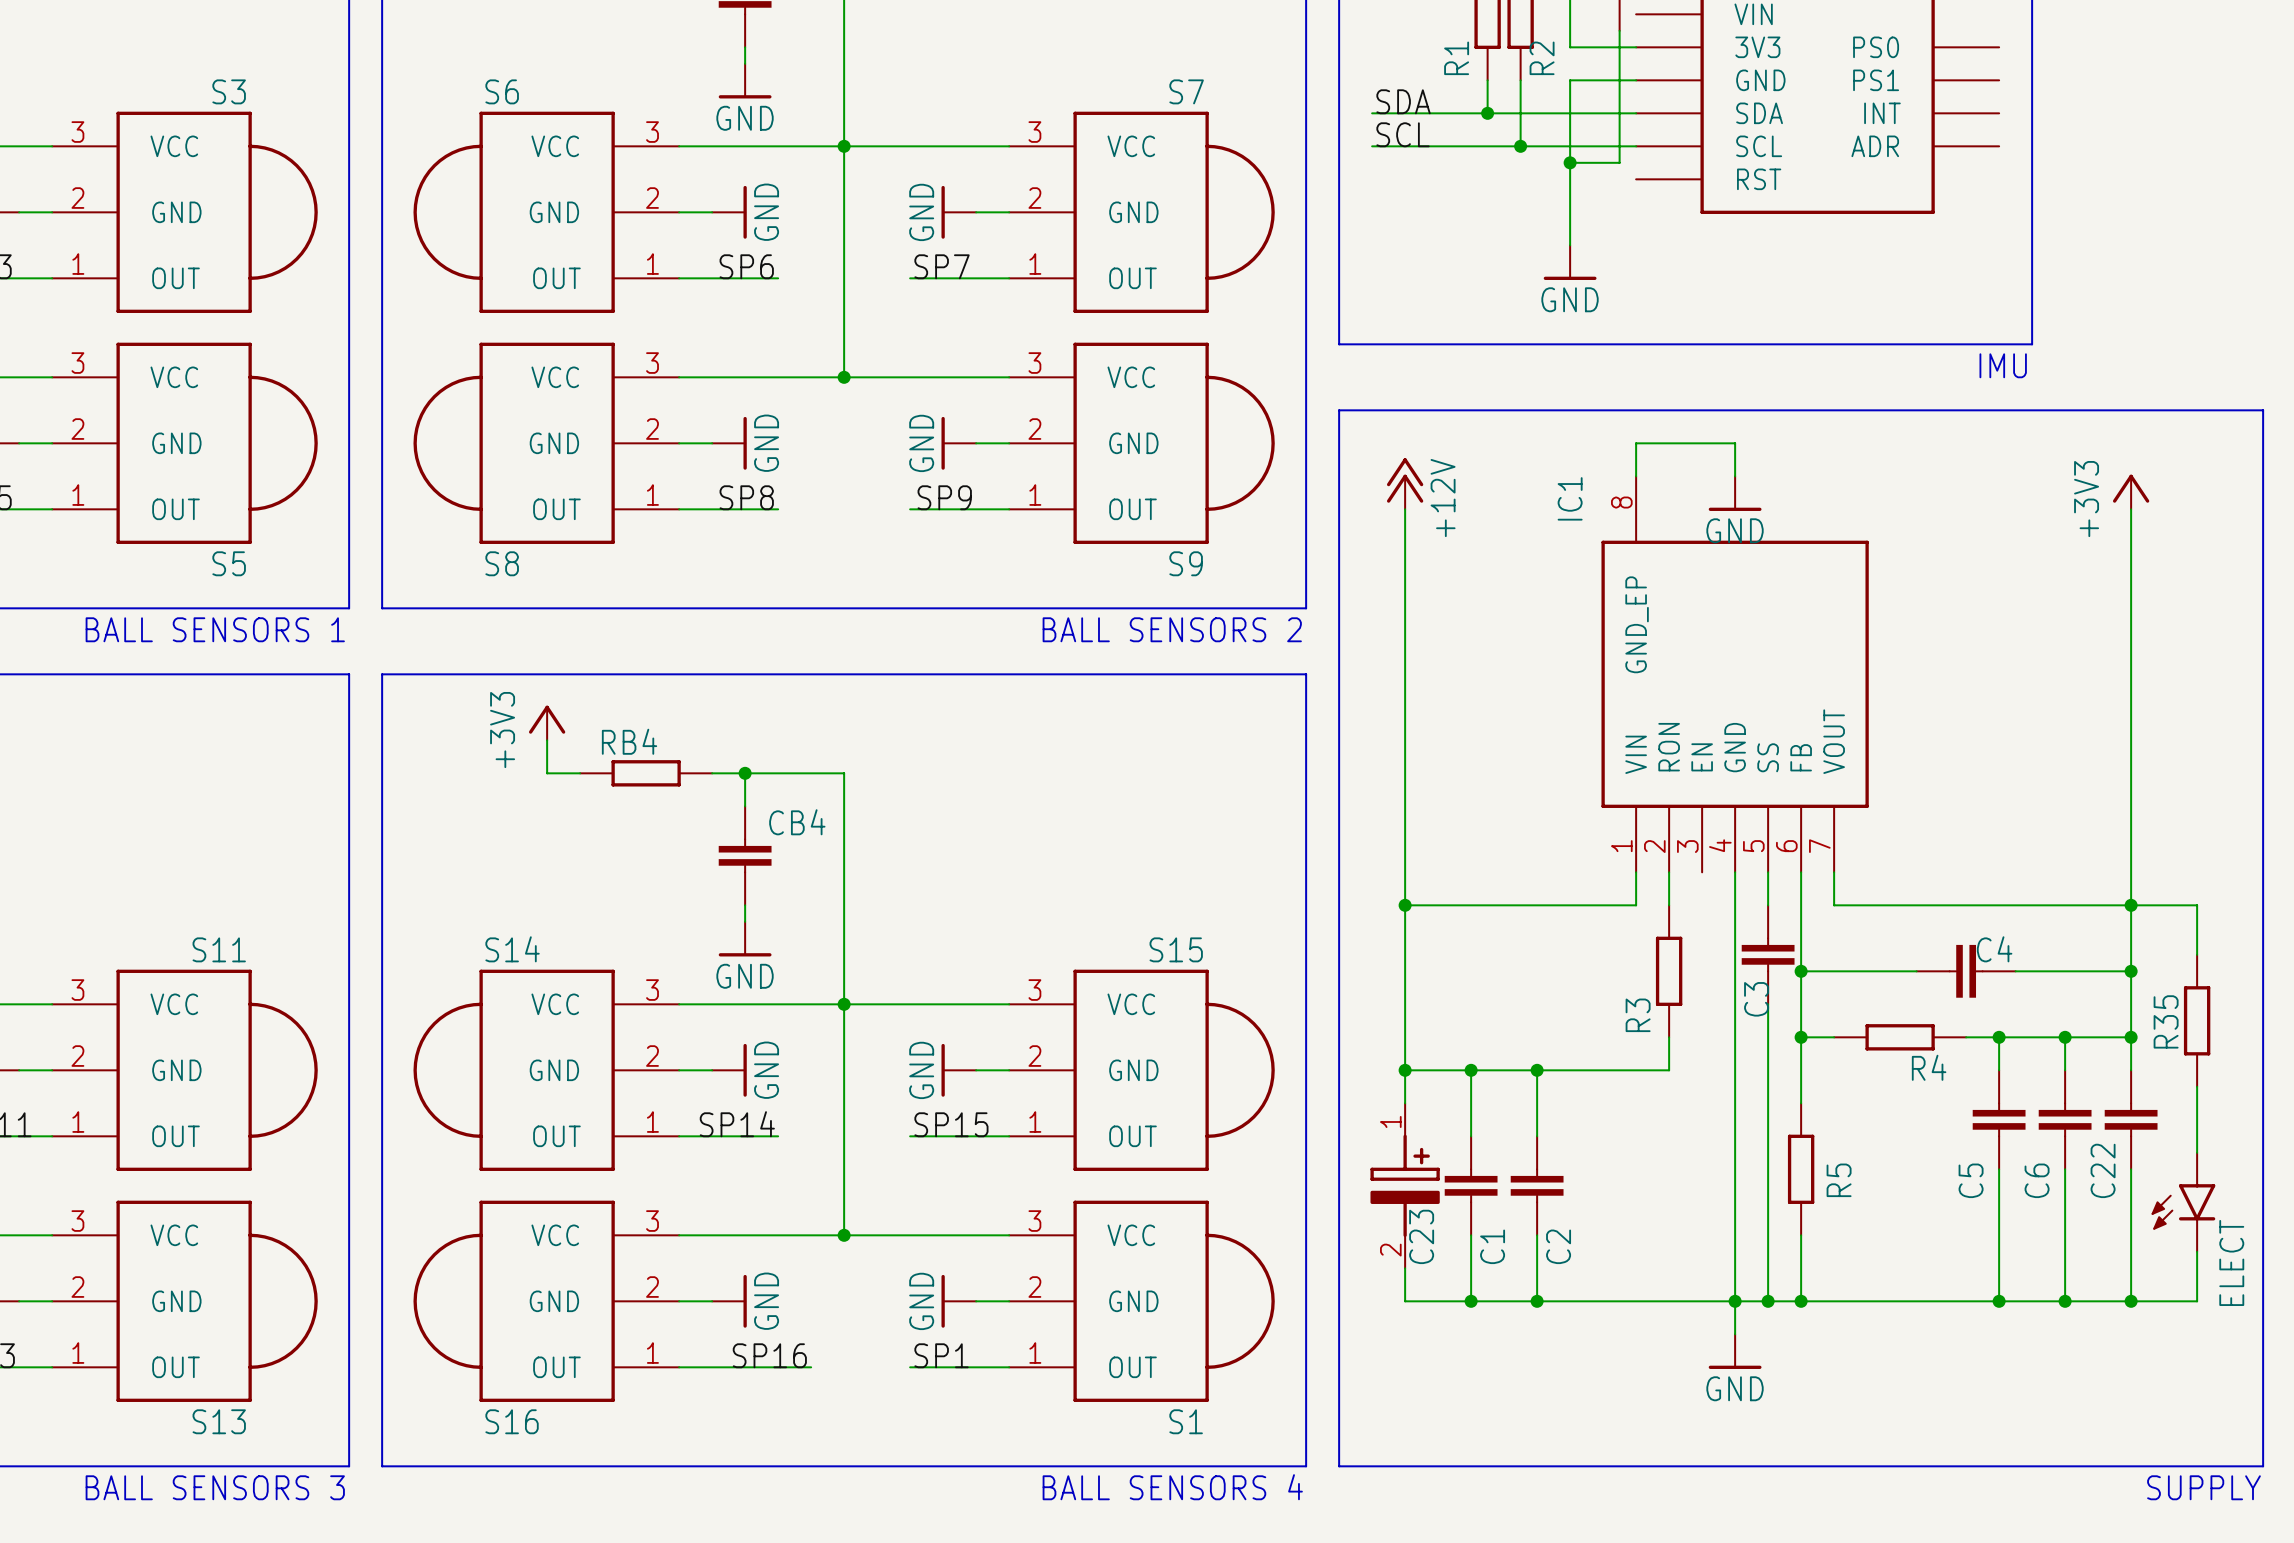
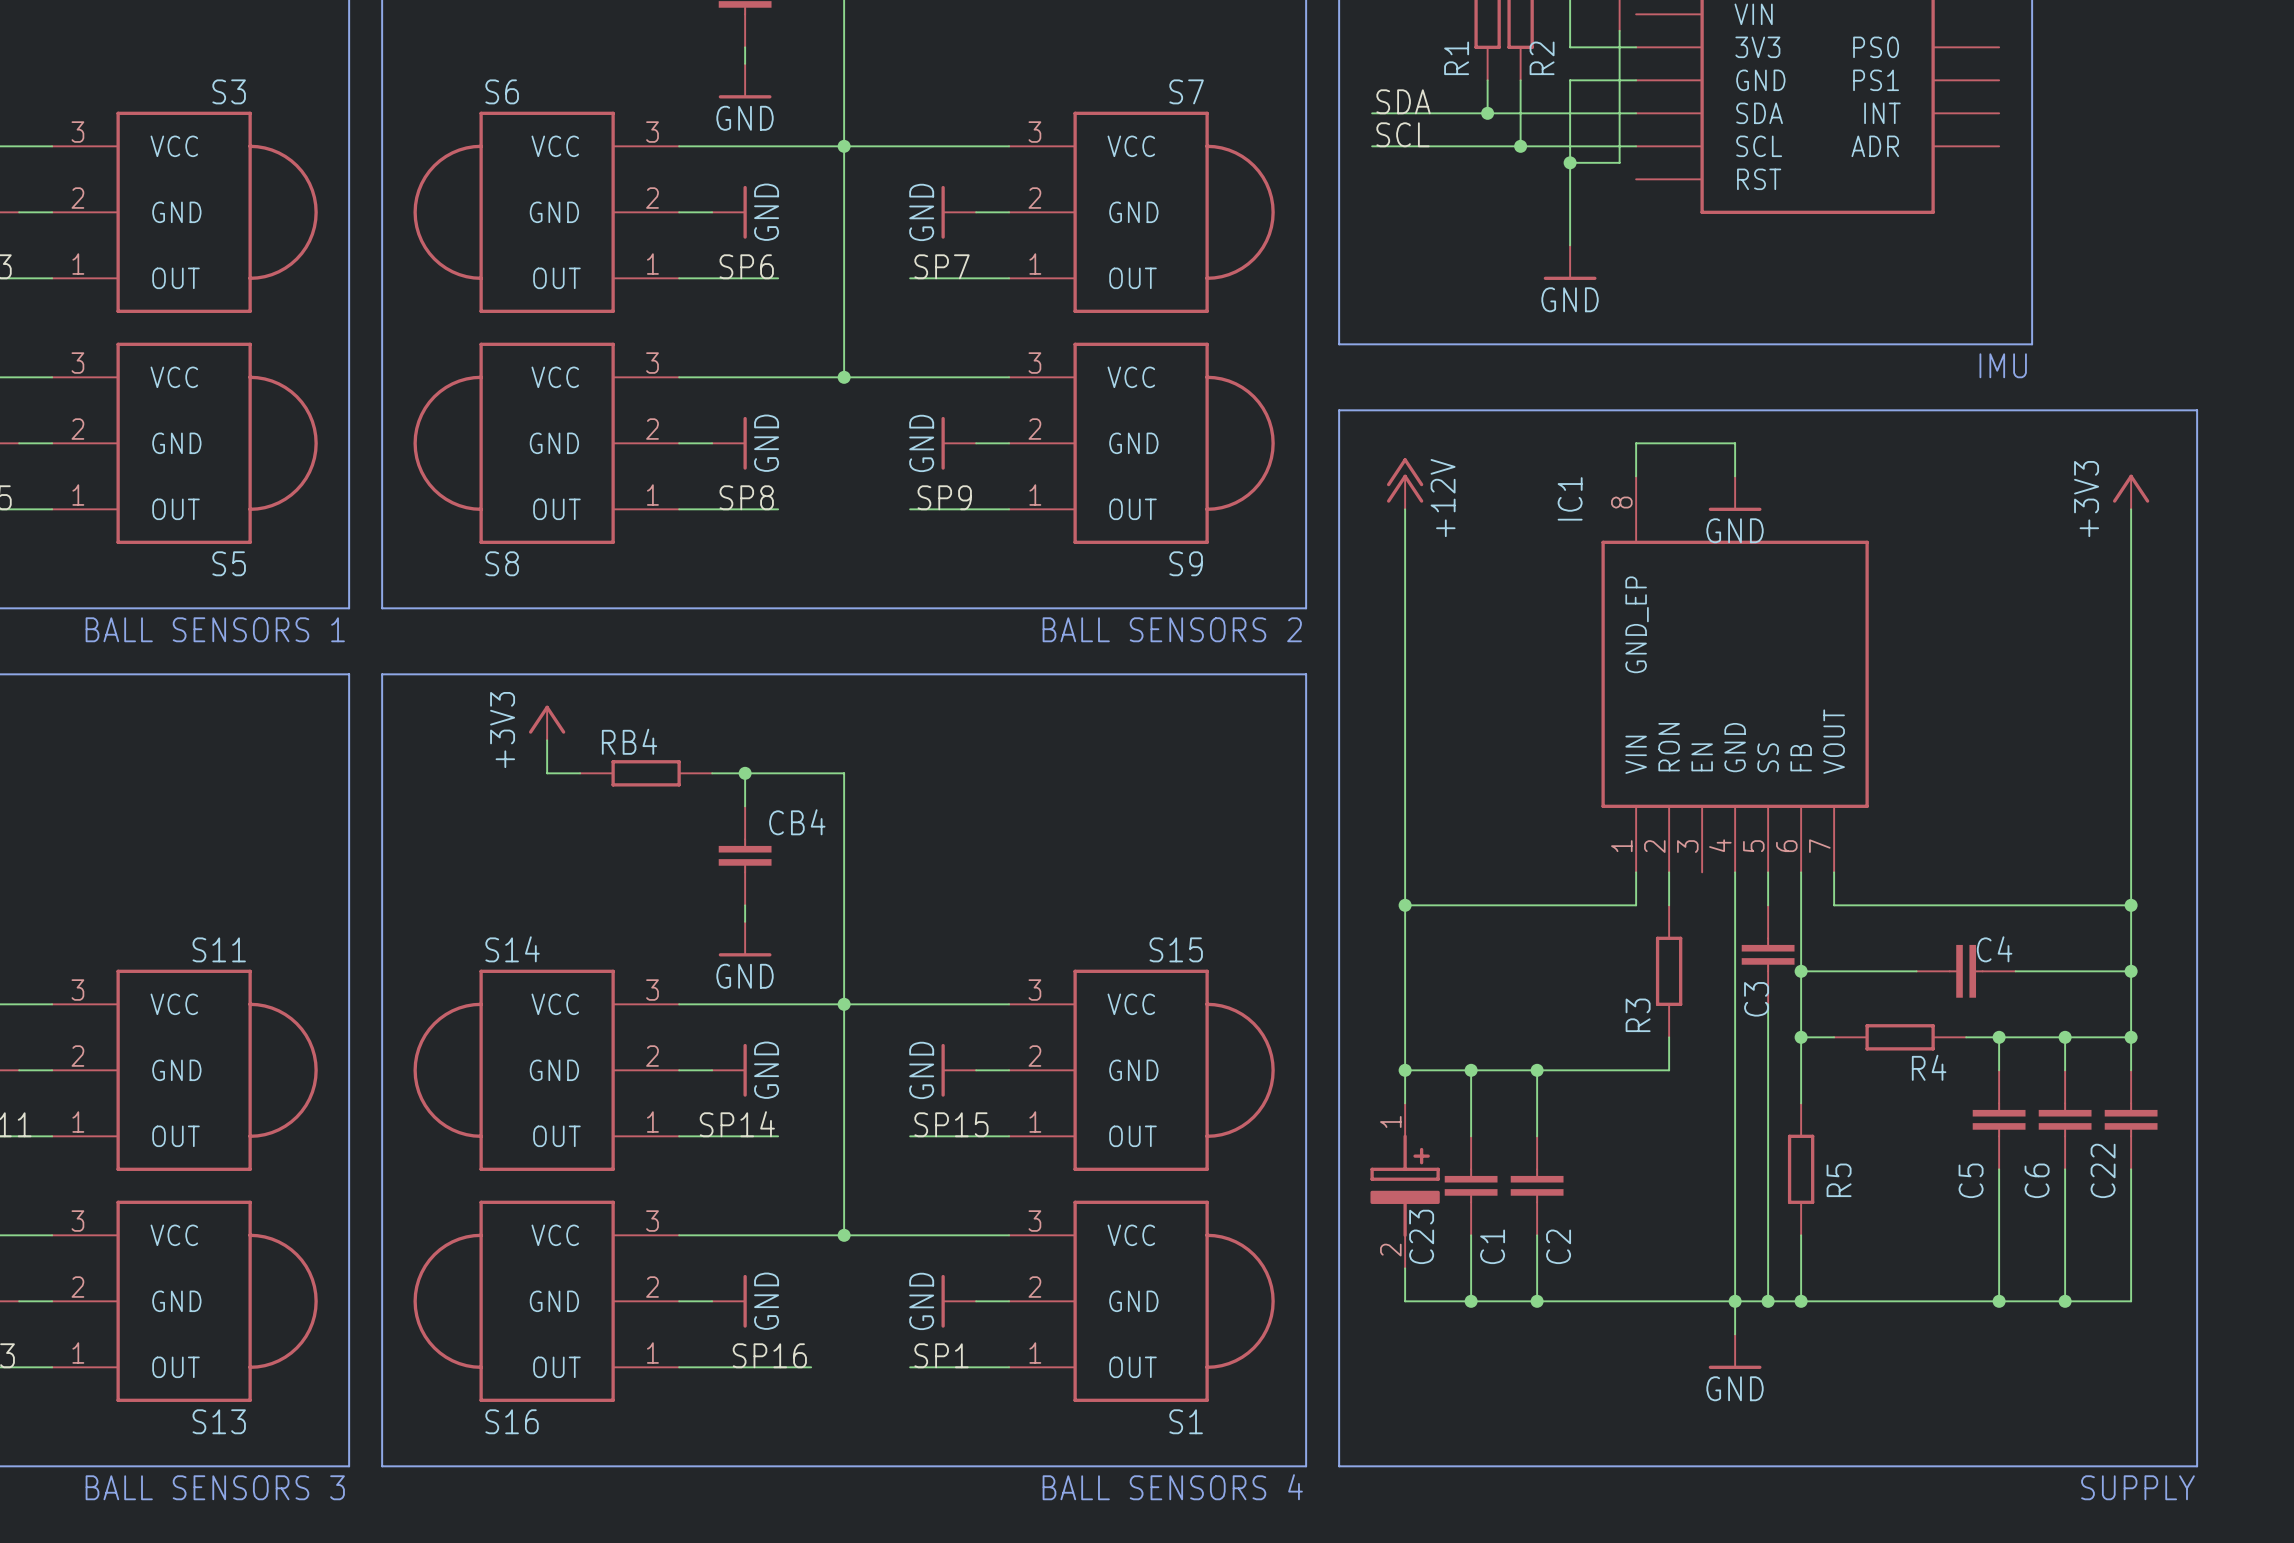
line: (2197, 410) (2263, 410) (2263, 1466) (2197, 1466) -> (2197, 410) (2197, 1466)
wire: (2131, 905) (2197, 905) (2197, 954) -> none
R35: (2197, 1020) -> none
ELECT: (2183, 1202) -> none
wire: (2197, 1251) (2197, 1301) (2131, 1301) -> none
junction: (2131, 1301) -> none
text position: SUPPLY (2203, 1487) -> SUPPLY (2137, 1487)

